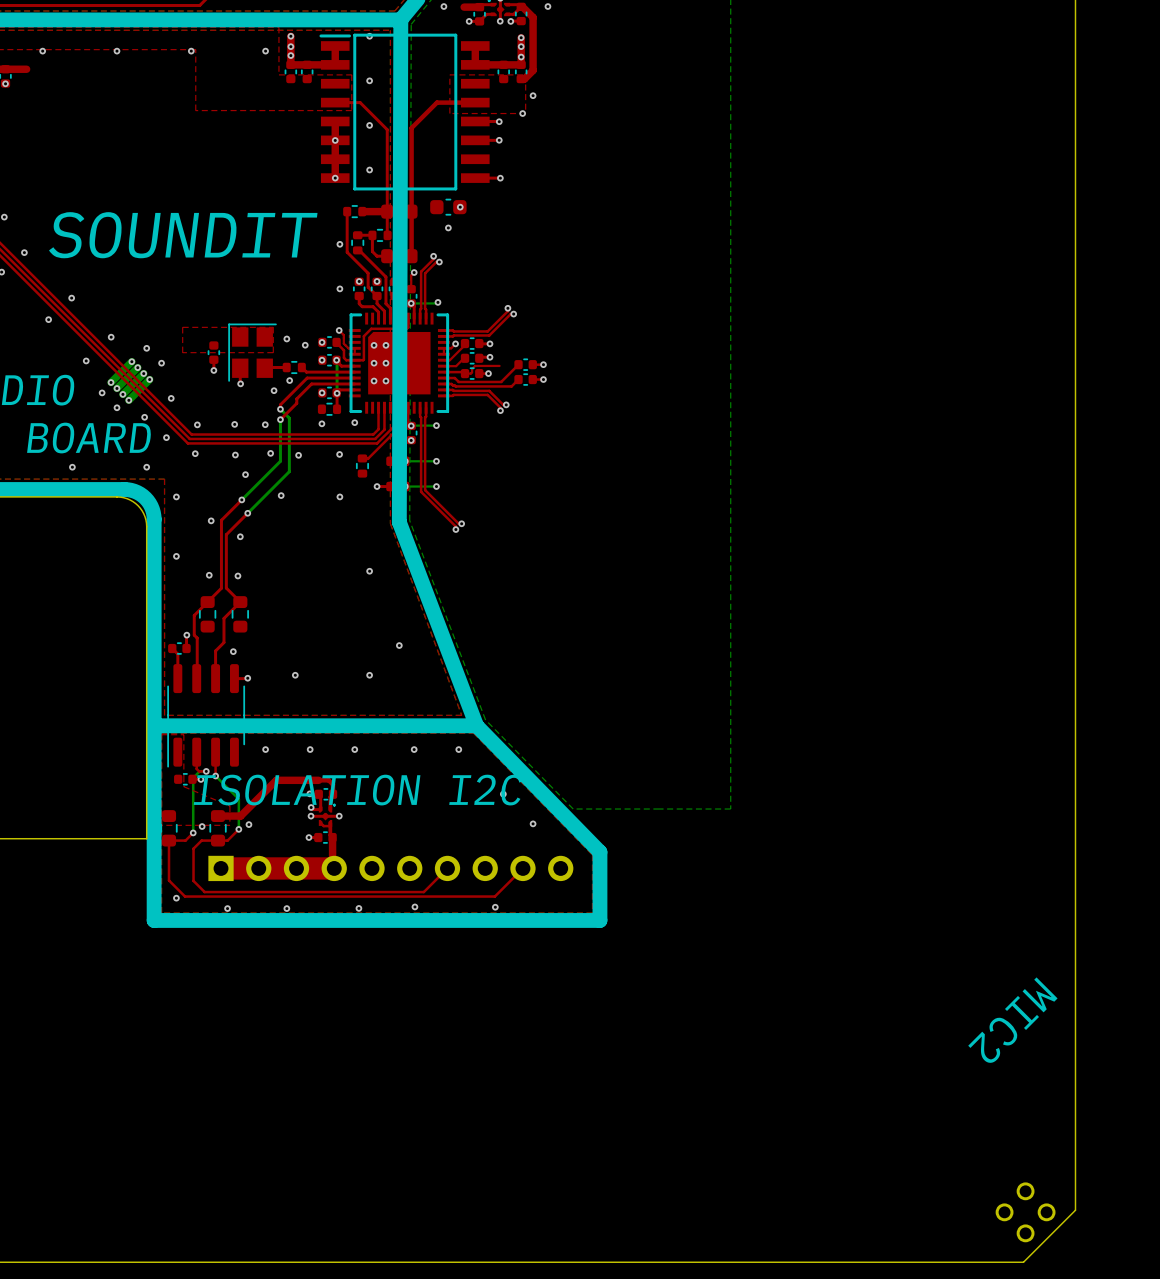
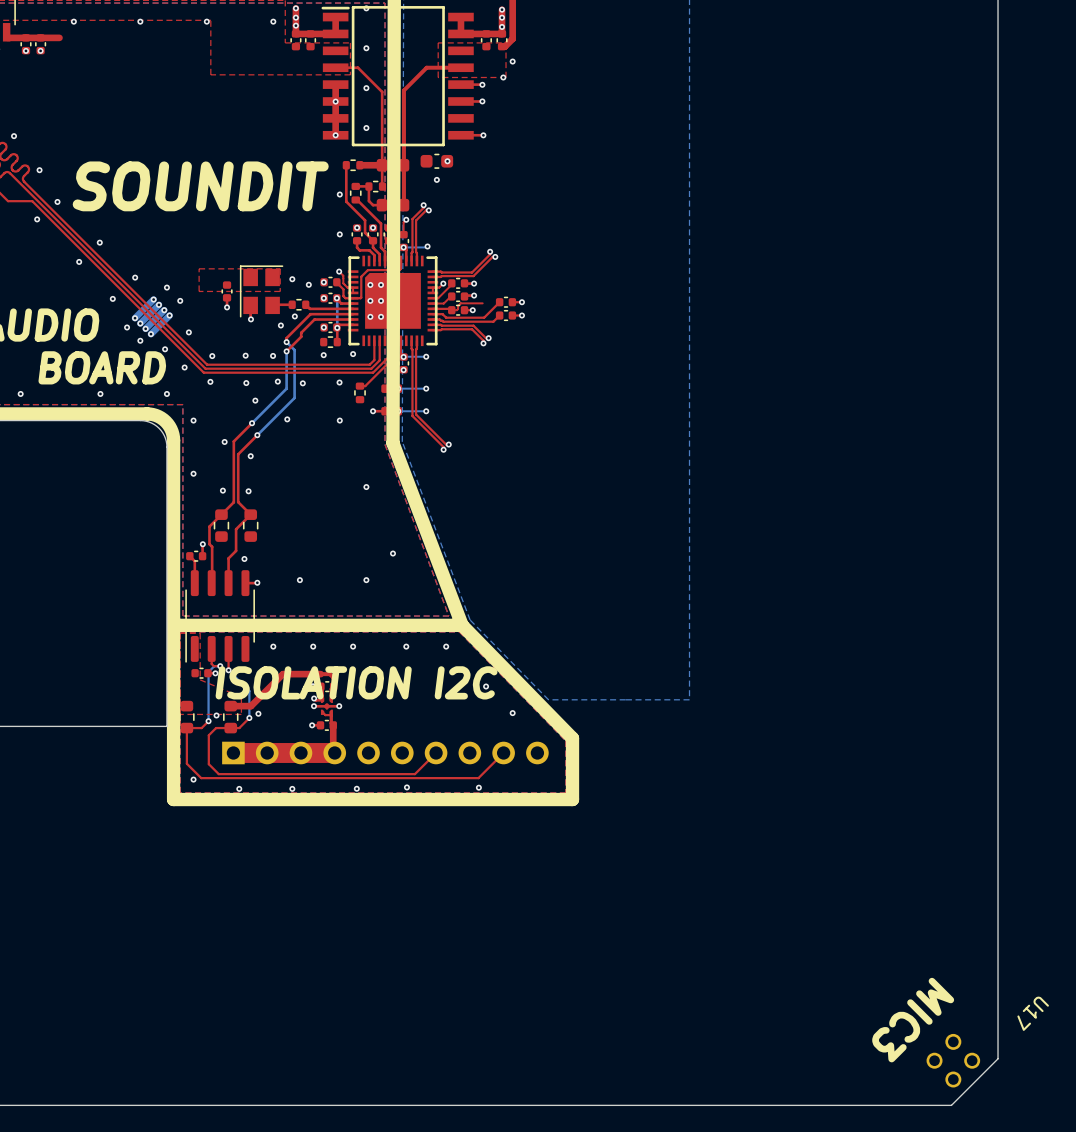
text: MIC2 (1012, 1020) -> none
U17 name: none -> U17 (1033, 1013)
text: none -> MIC3 (913, 1020)

